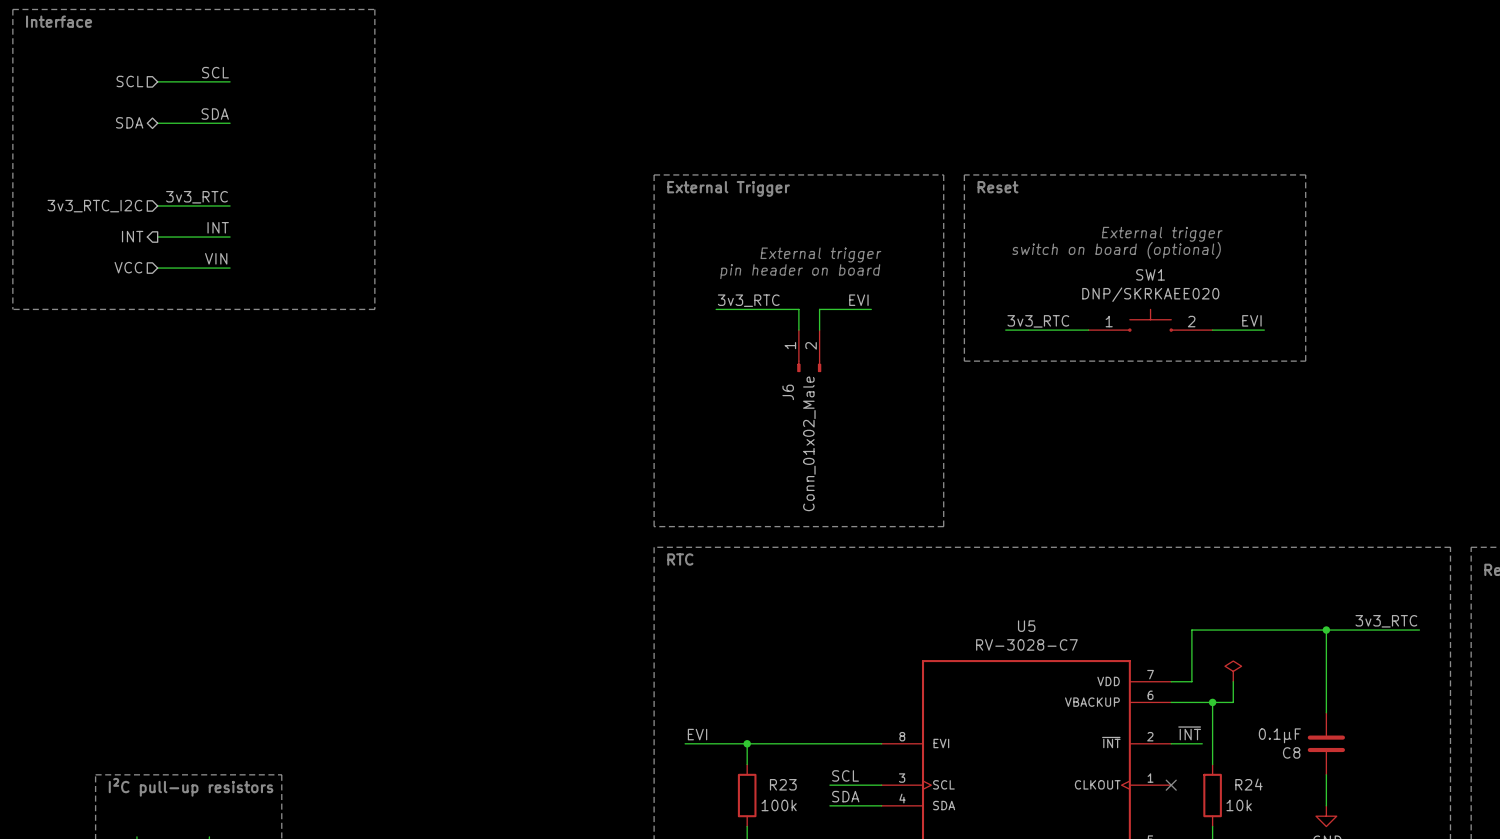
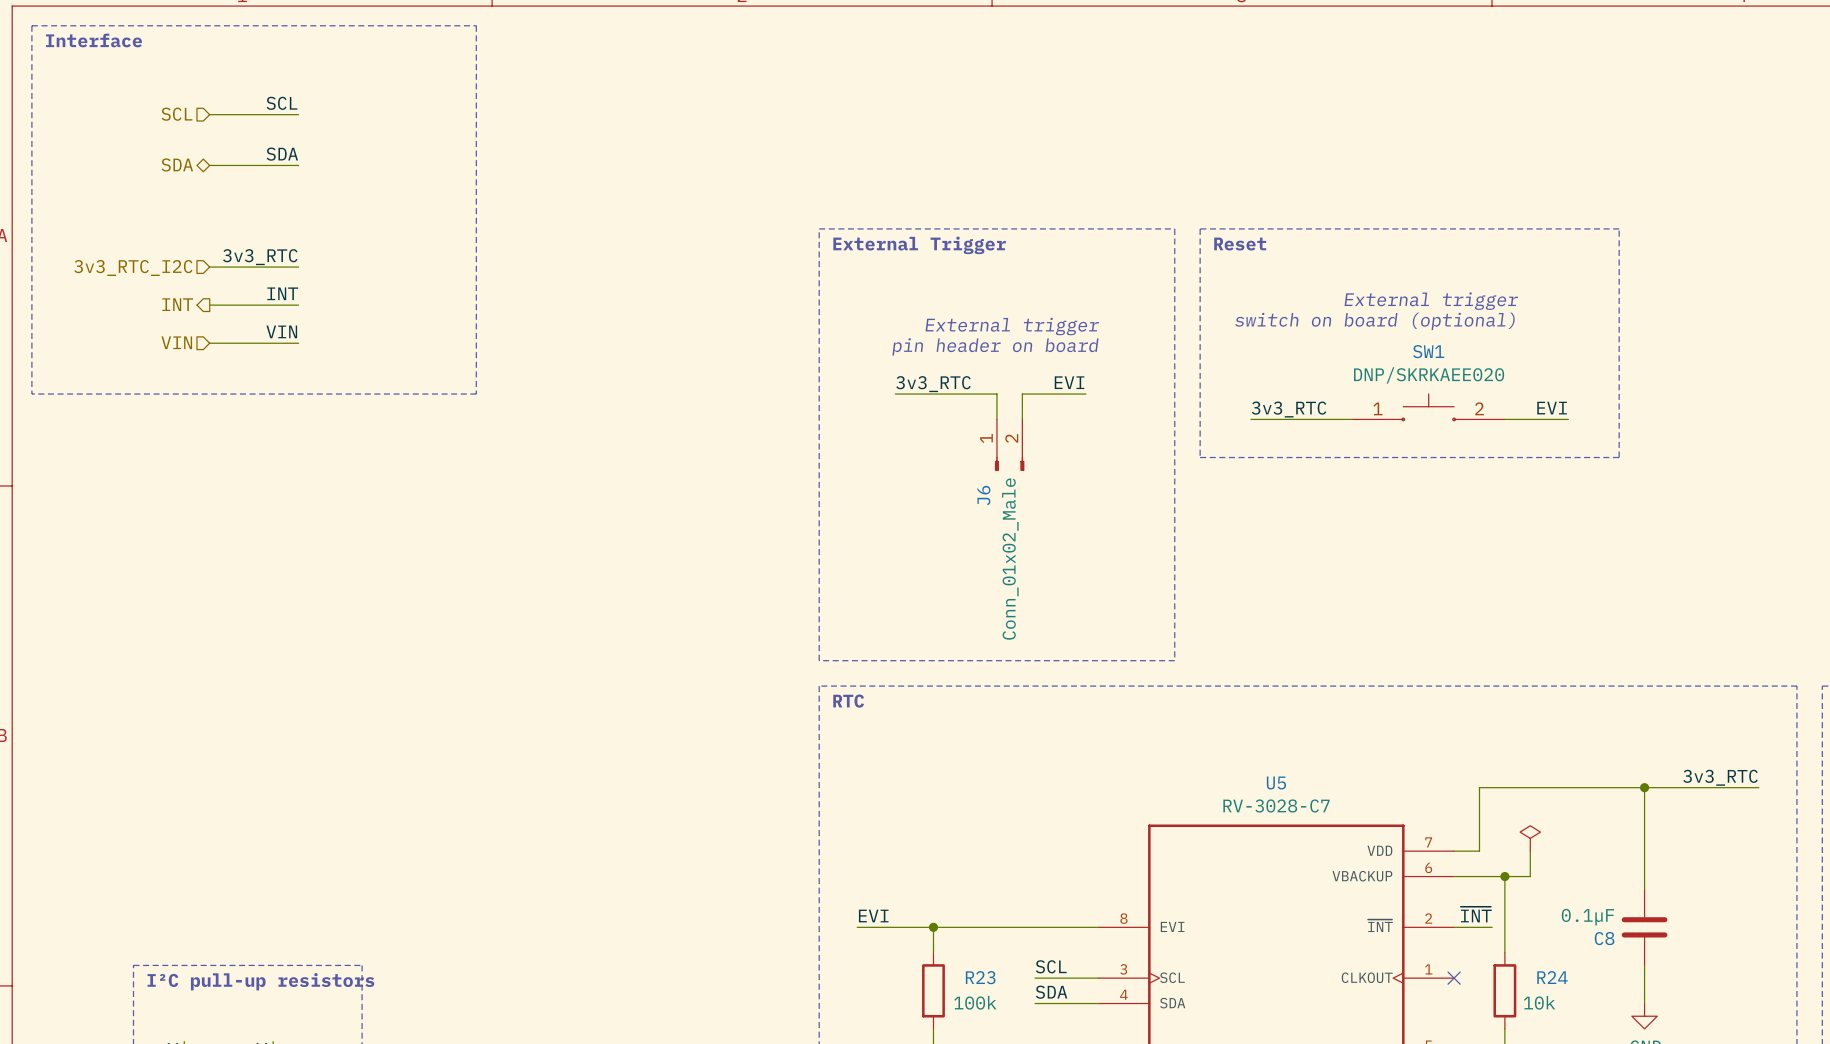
hierarchical label: VCC (128, 267) -> VIN (176, 342)

